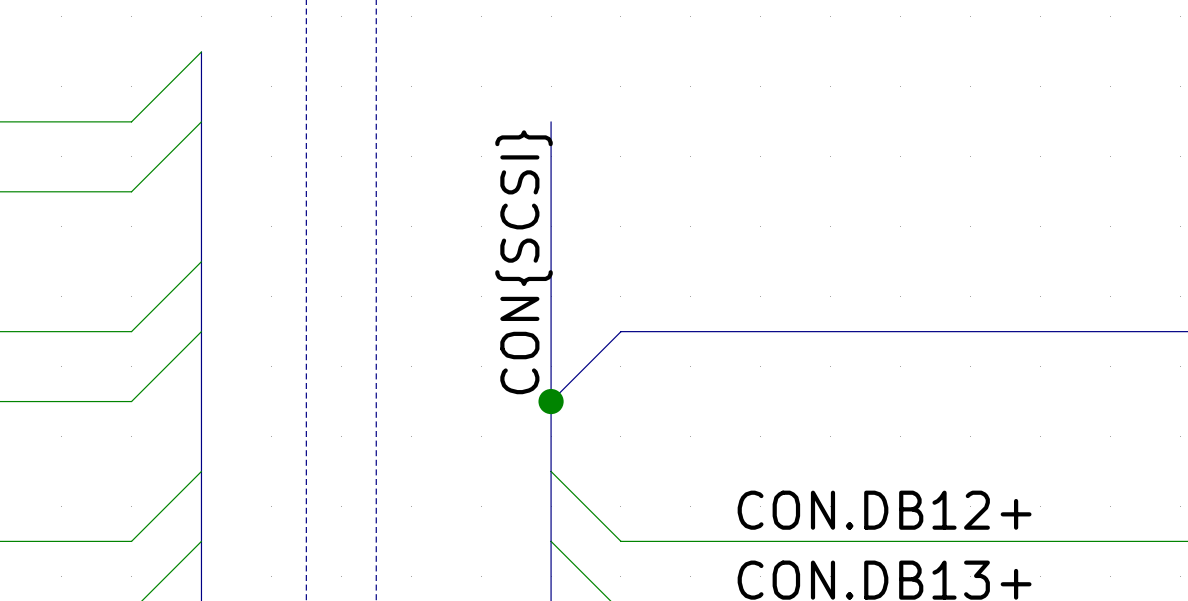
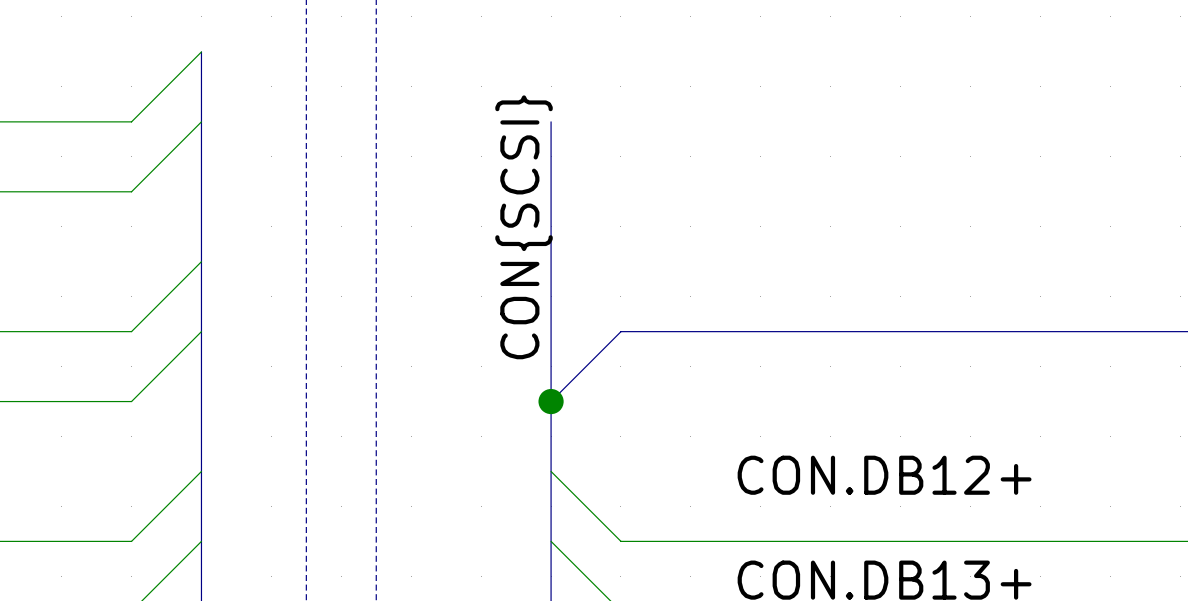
label position: CON{SCSI} (524, 262) -> CON{SCSI} (524, 227)
label position: CON.DB12+ (884, 510) -> CON.DB12+ (884, 475)

